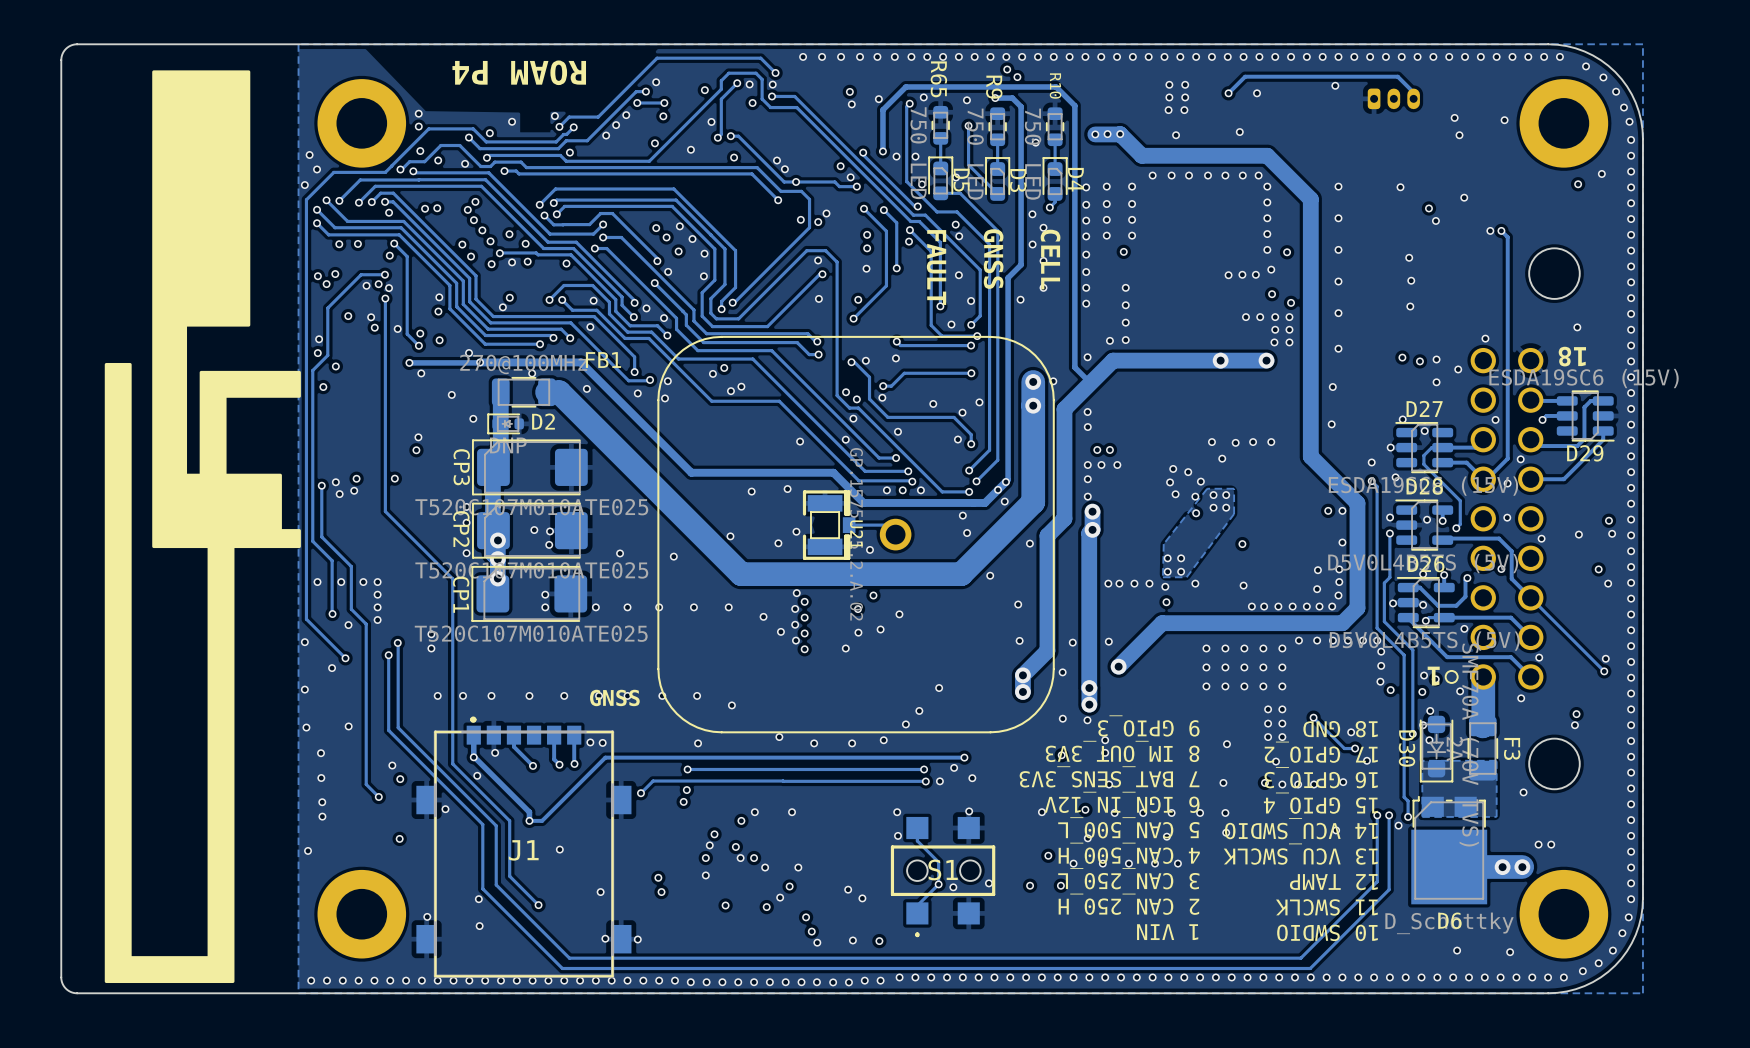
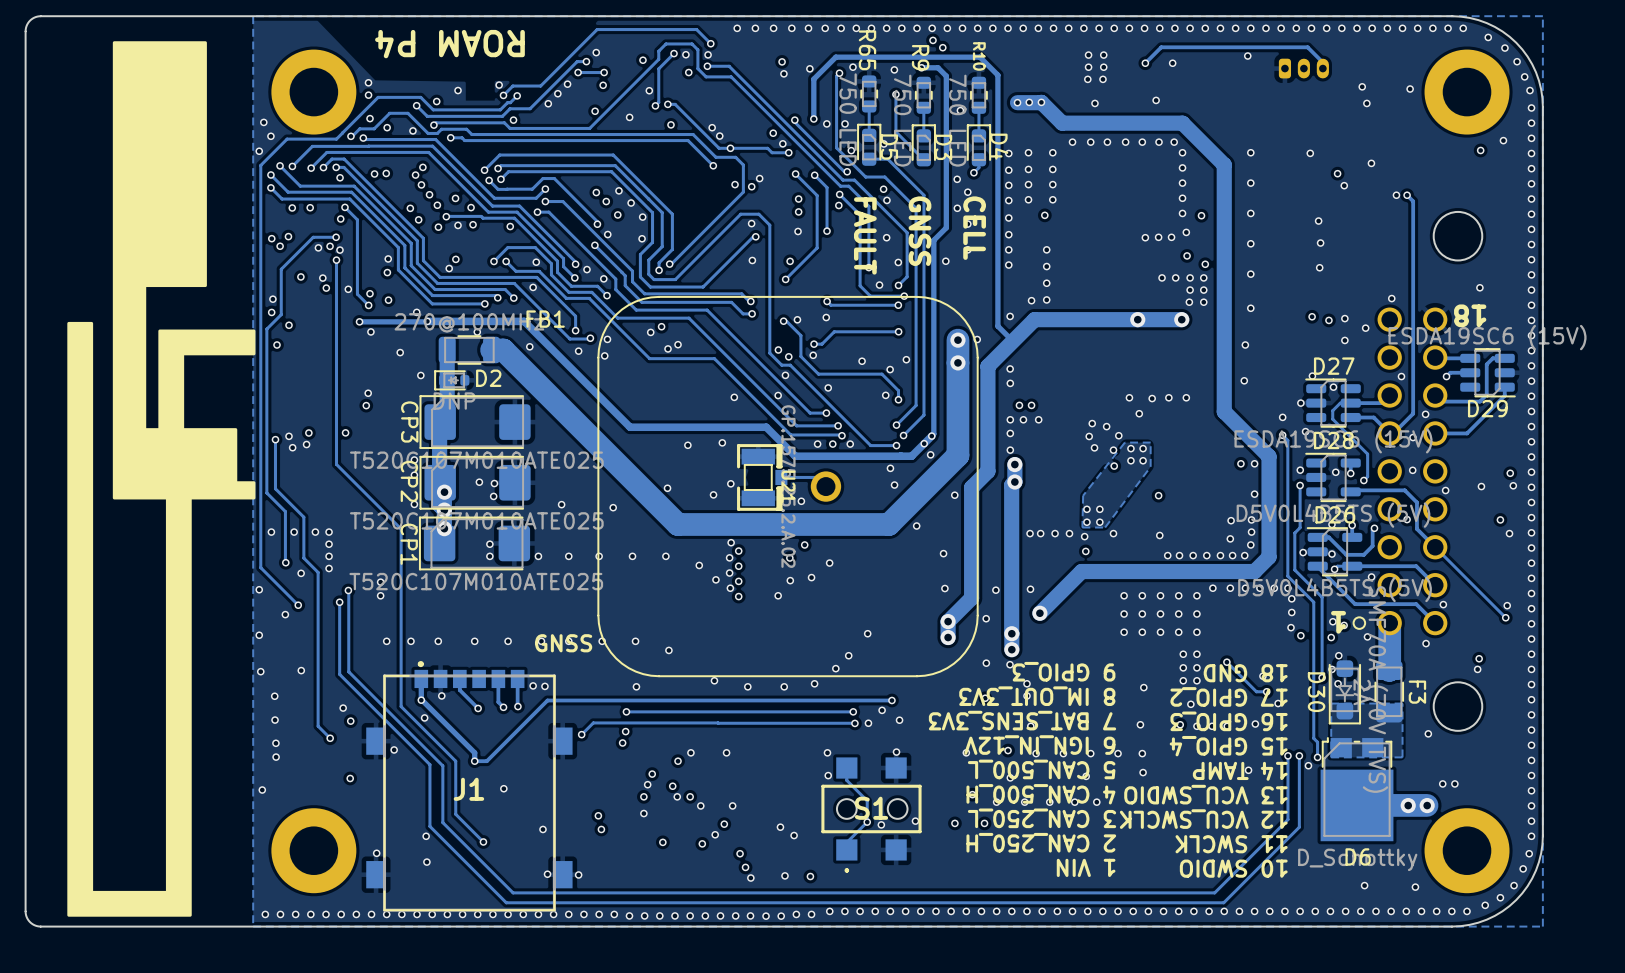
text: 14 VCU_SWDIO (1301, 828) -> 14 TAMP (1240, 771)
text: 13 VCU_SWCLK (1300, 854) -> 13 VCU_SWDIO (1205, 794)
text: 12 TAMP (1333, 882) -> 12 VCU_SWCLK (1203, 819)

